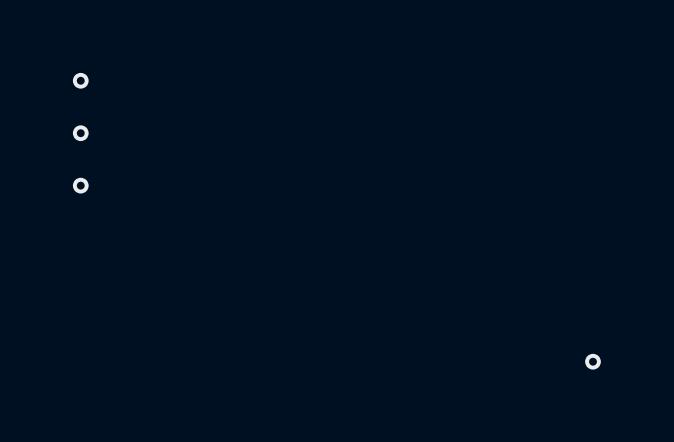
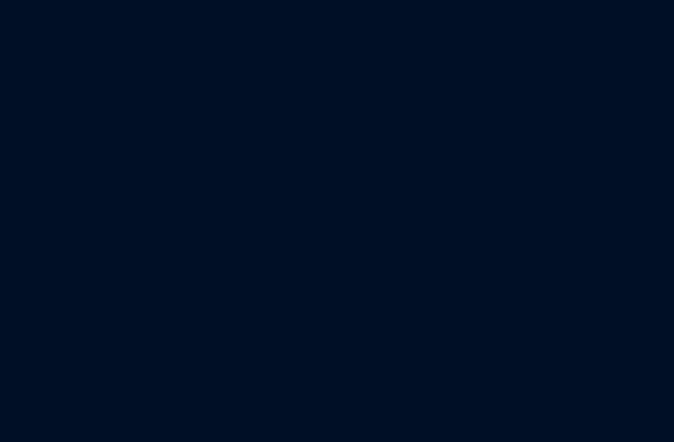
via: (80, 80) -> none
via: (80, 133) -> none
via: (80, 185) -> none
via: (592, 361) -> none

